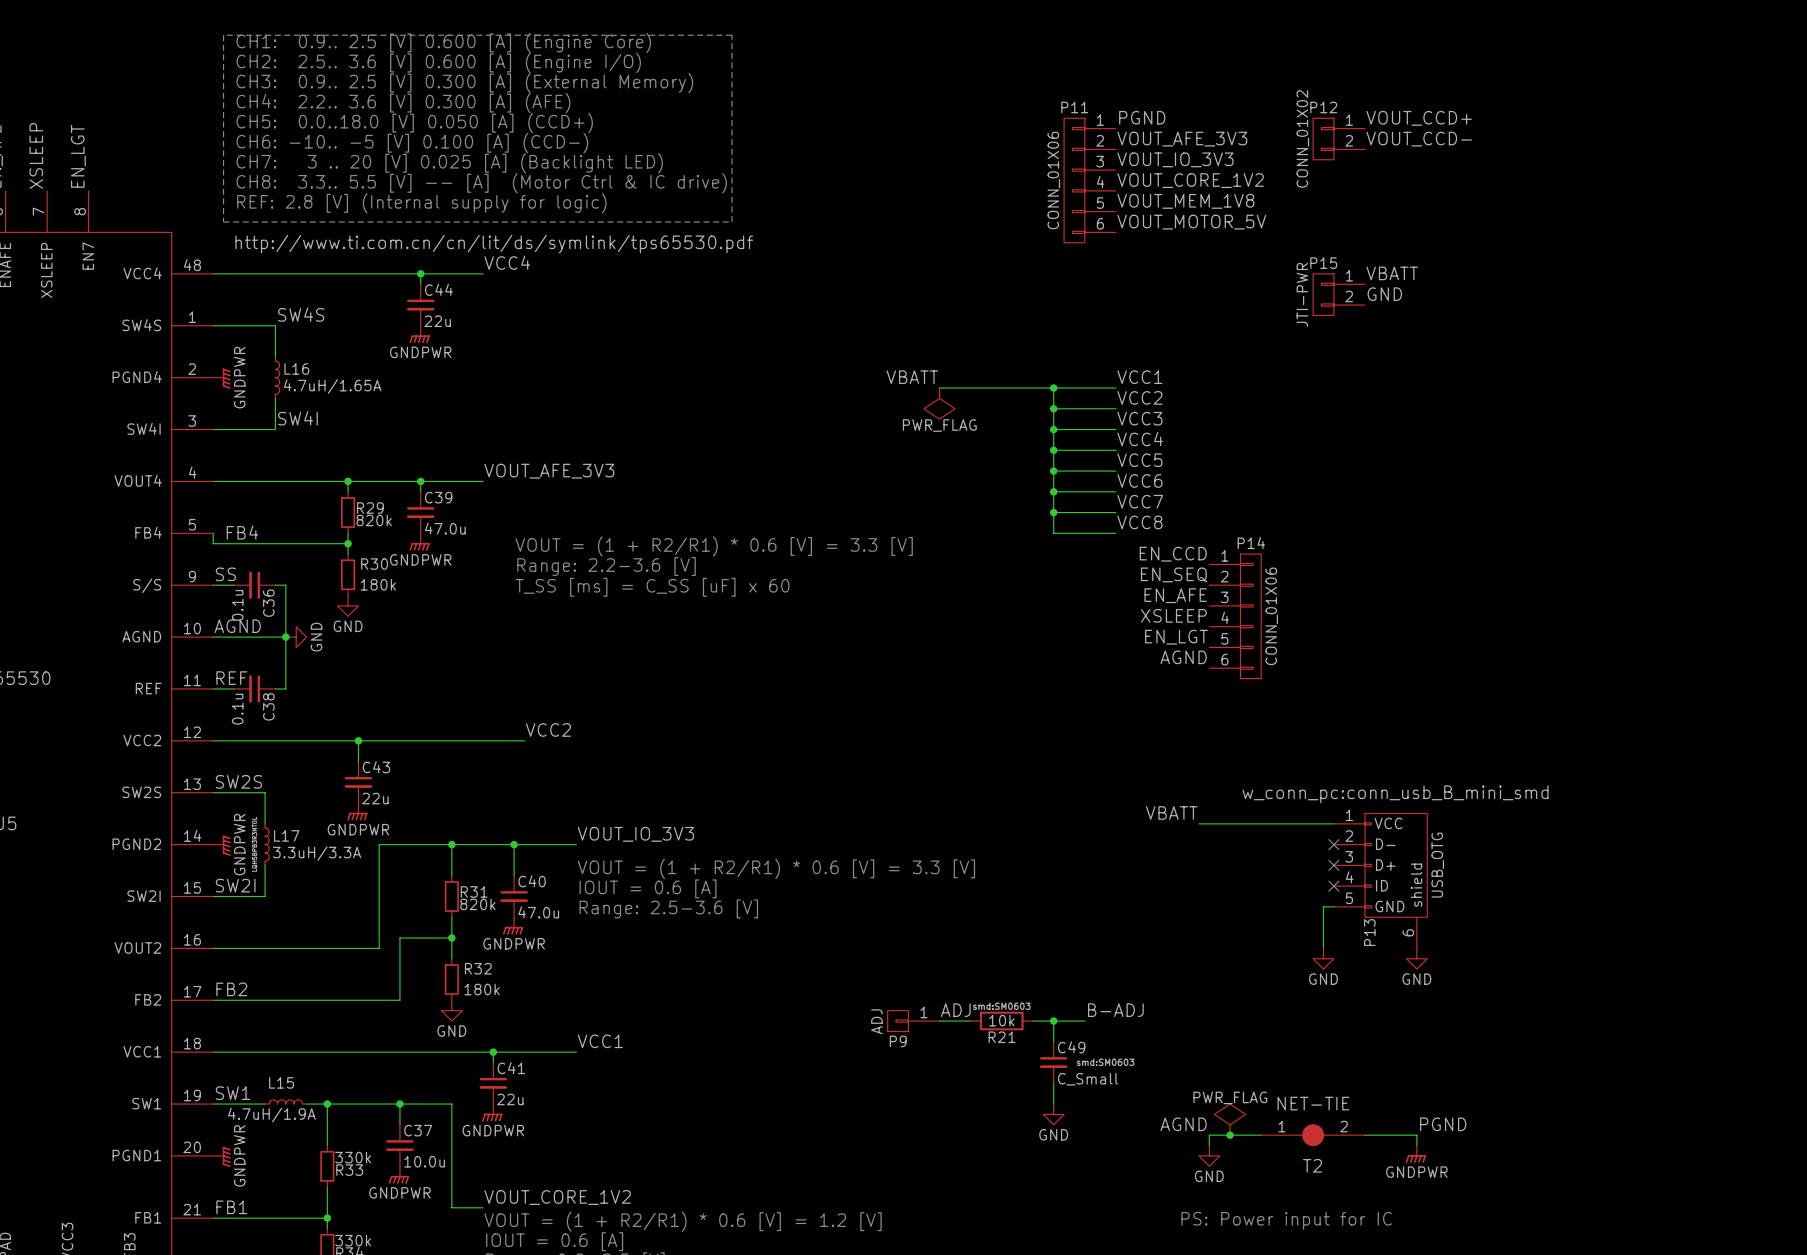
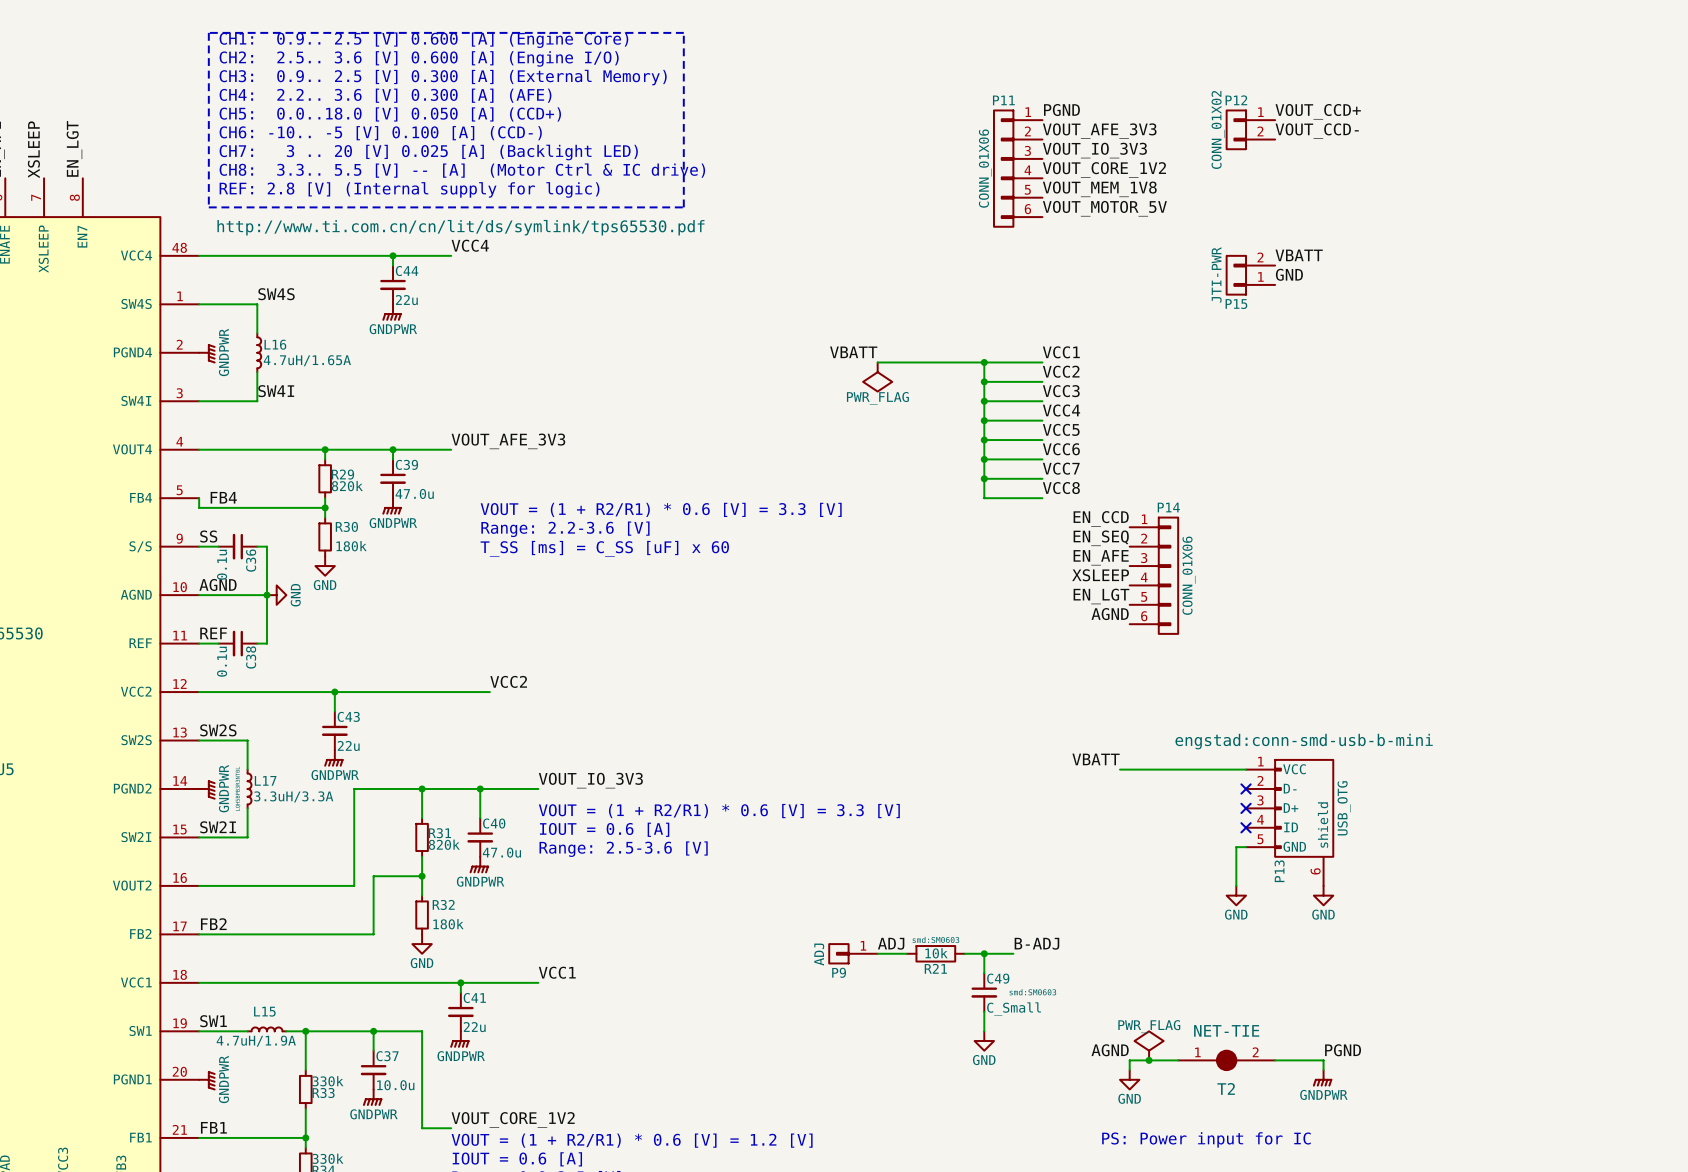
P15 flip: as is (1323, 294) -> up-down (1236, 275)
P13 text: w_conn_pc:conn_usb_B_mini_smd (1395, 794) -> engstad:conn-smd-usb-b-mini (1304, 741)

